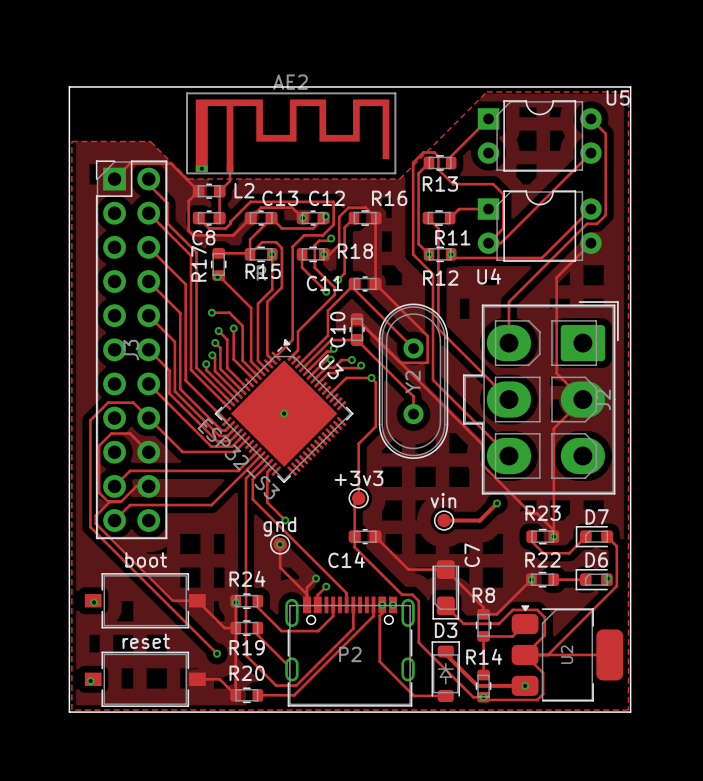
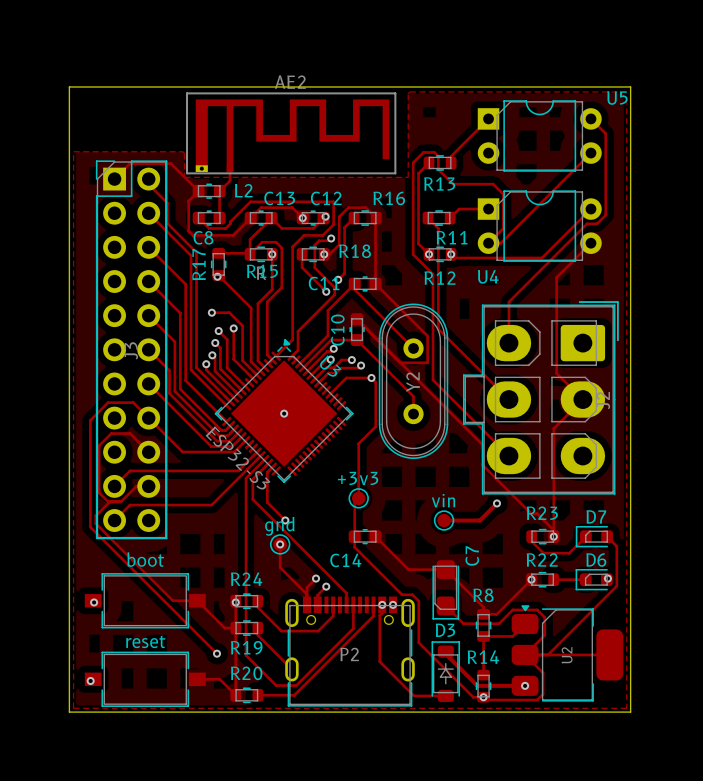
zone outline: (486, 92) (399, 179) (187, 179) (150, 141) (71, 141) (71, 710) (628, 710) (628, 92) (619, 92) -> (486, 92) (409, 92) (408, 93) (408, 177) (184, 177) (184, 153) (182, 151) (73, 151) (73, 708) (626, 708) (626, 98) (619, 92)

